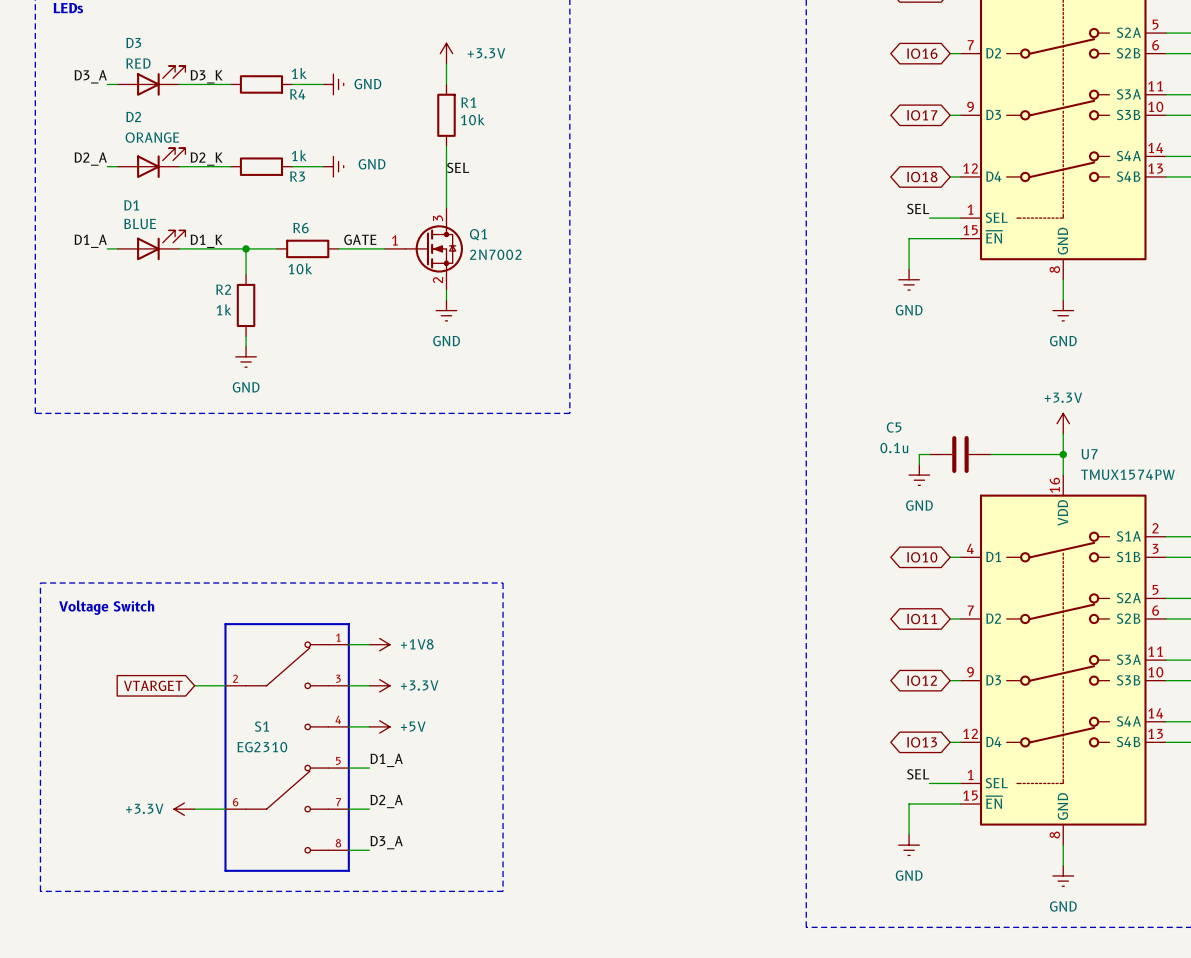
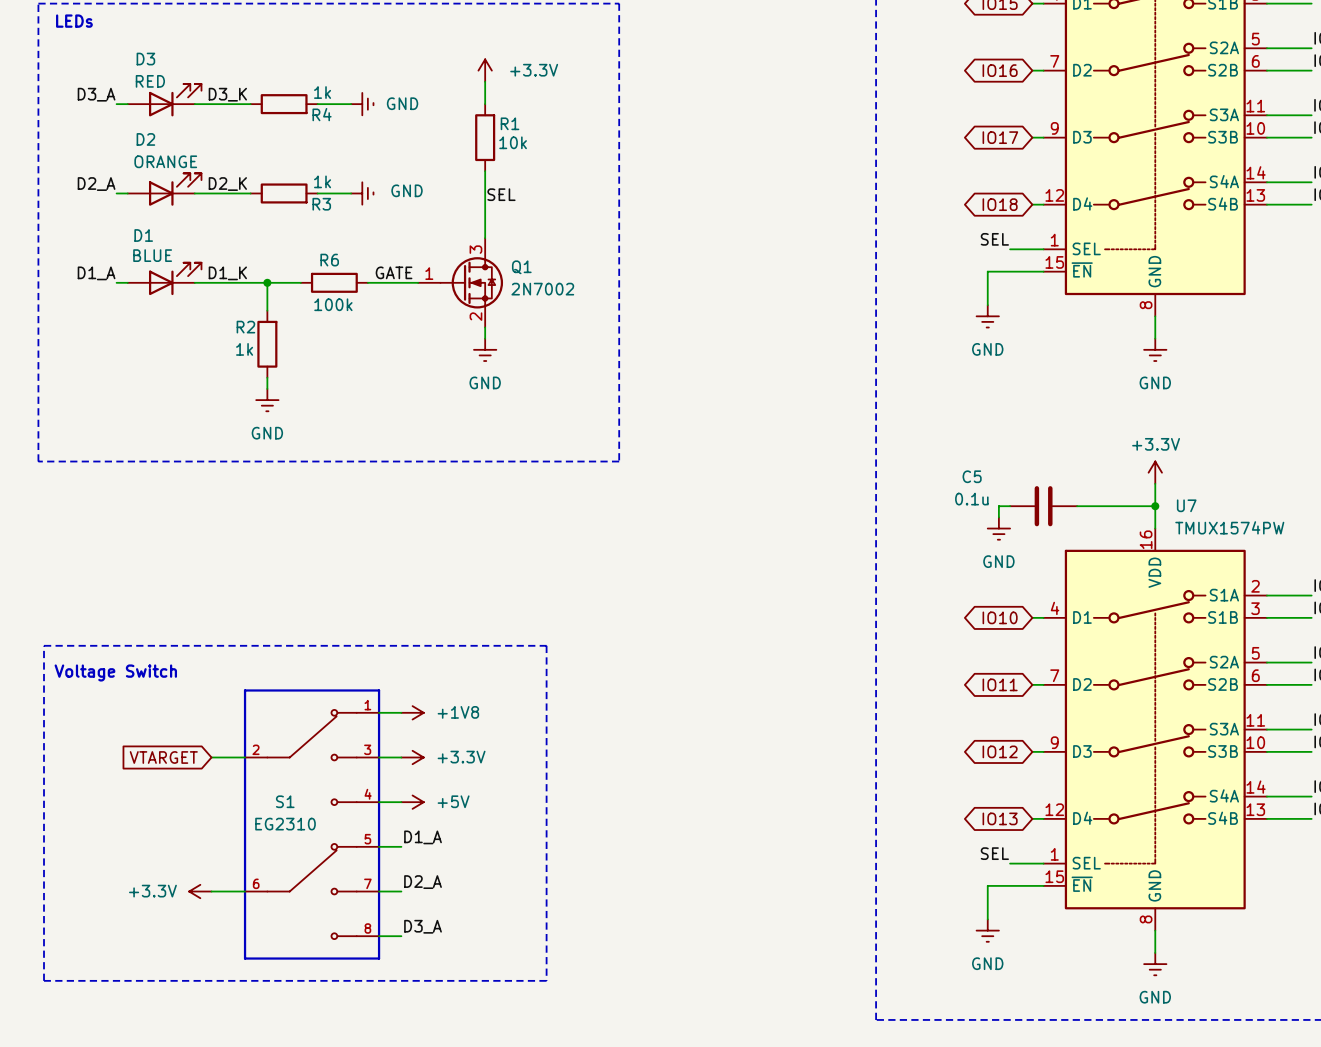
R6 value: 10k (300, 268) -> 100k (333, 304)

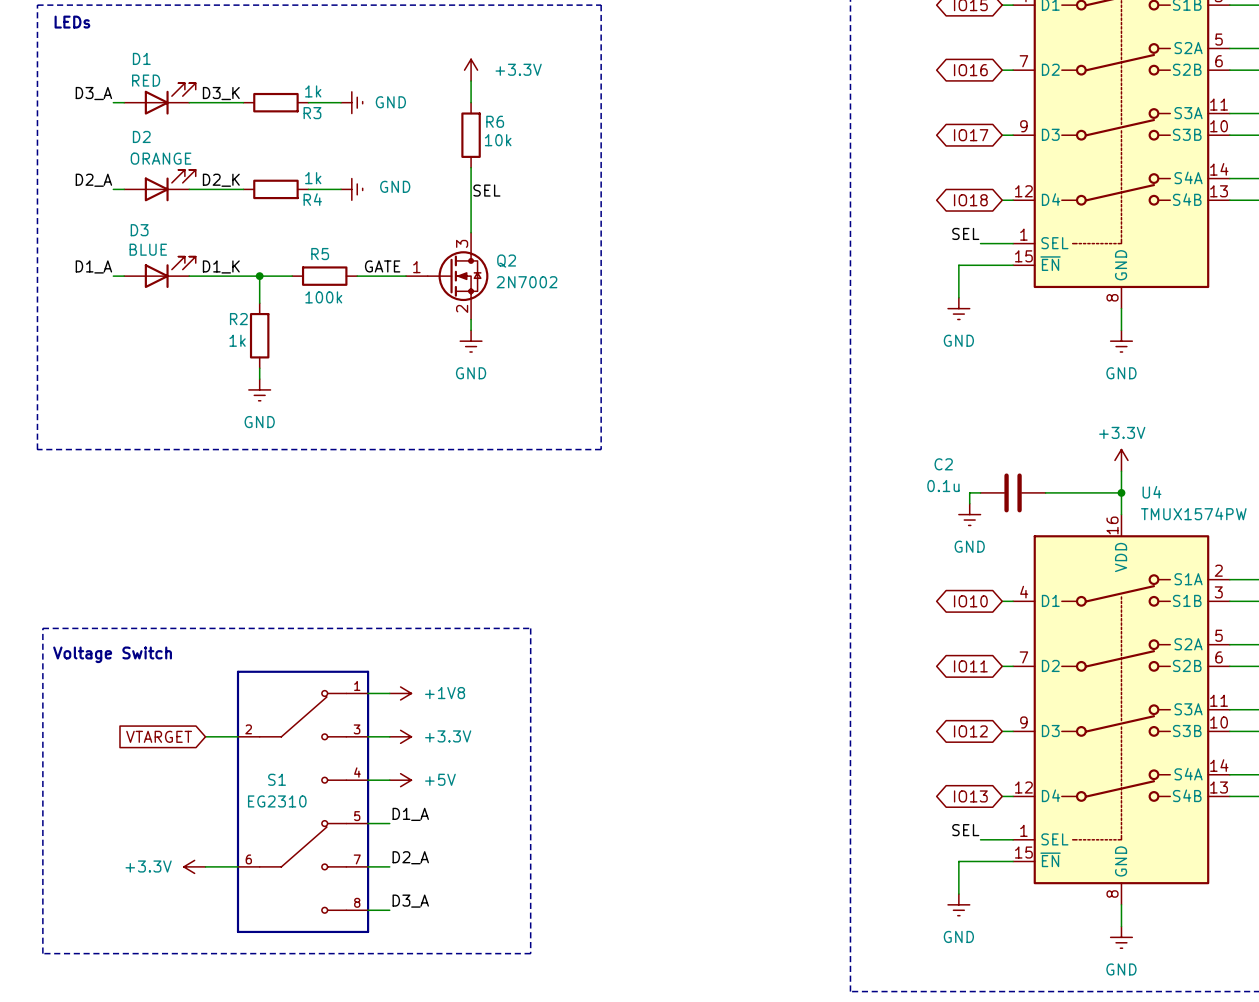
D3 name: D3 (145, 59) -> D1 (141, 58)
R4 name: R4 (322, 114) -> R3 (312, 113)
R1 name: R1 (510, 123) -> R6 (495, 121)
R3 name: R3 (321, 204) -> R4 (312, 199)
D1 name: D1 (143, 235) -> D3 (139, 230)
R6 name: R6 (329, 260) -> R5 (320, 254)
Q1 name: Q1 (521, 267) -> Q2 (506, 261)
C5 name: C5 (972, 476) -> C2 (943, 464)
U7 name: U7 (1186, 505) -> U4 (1151, 492)

